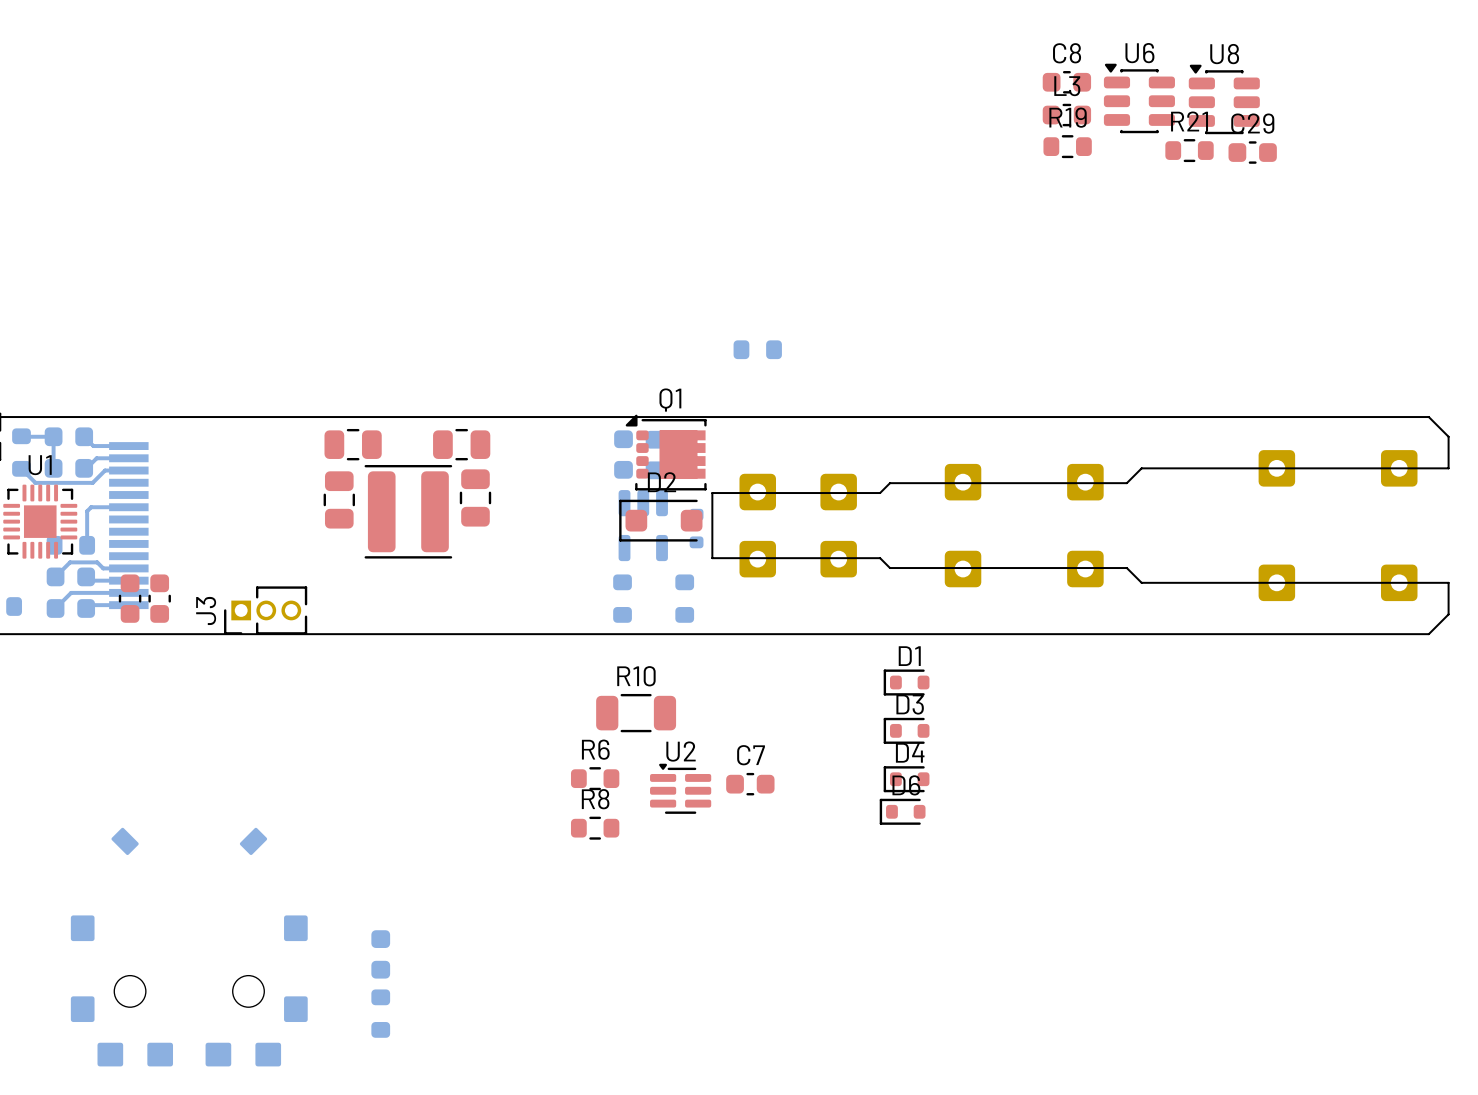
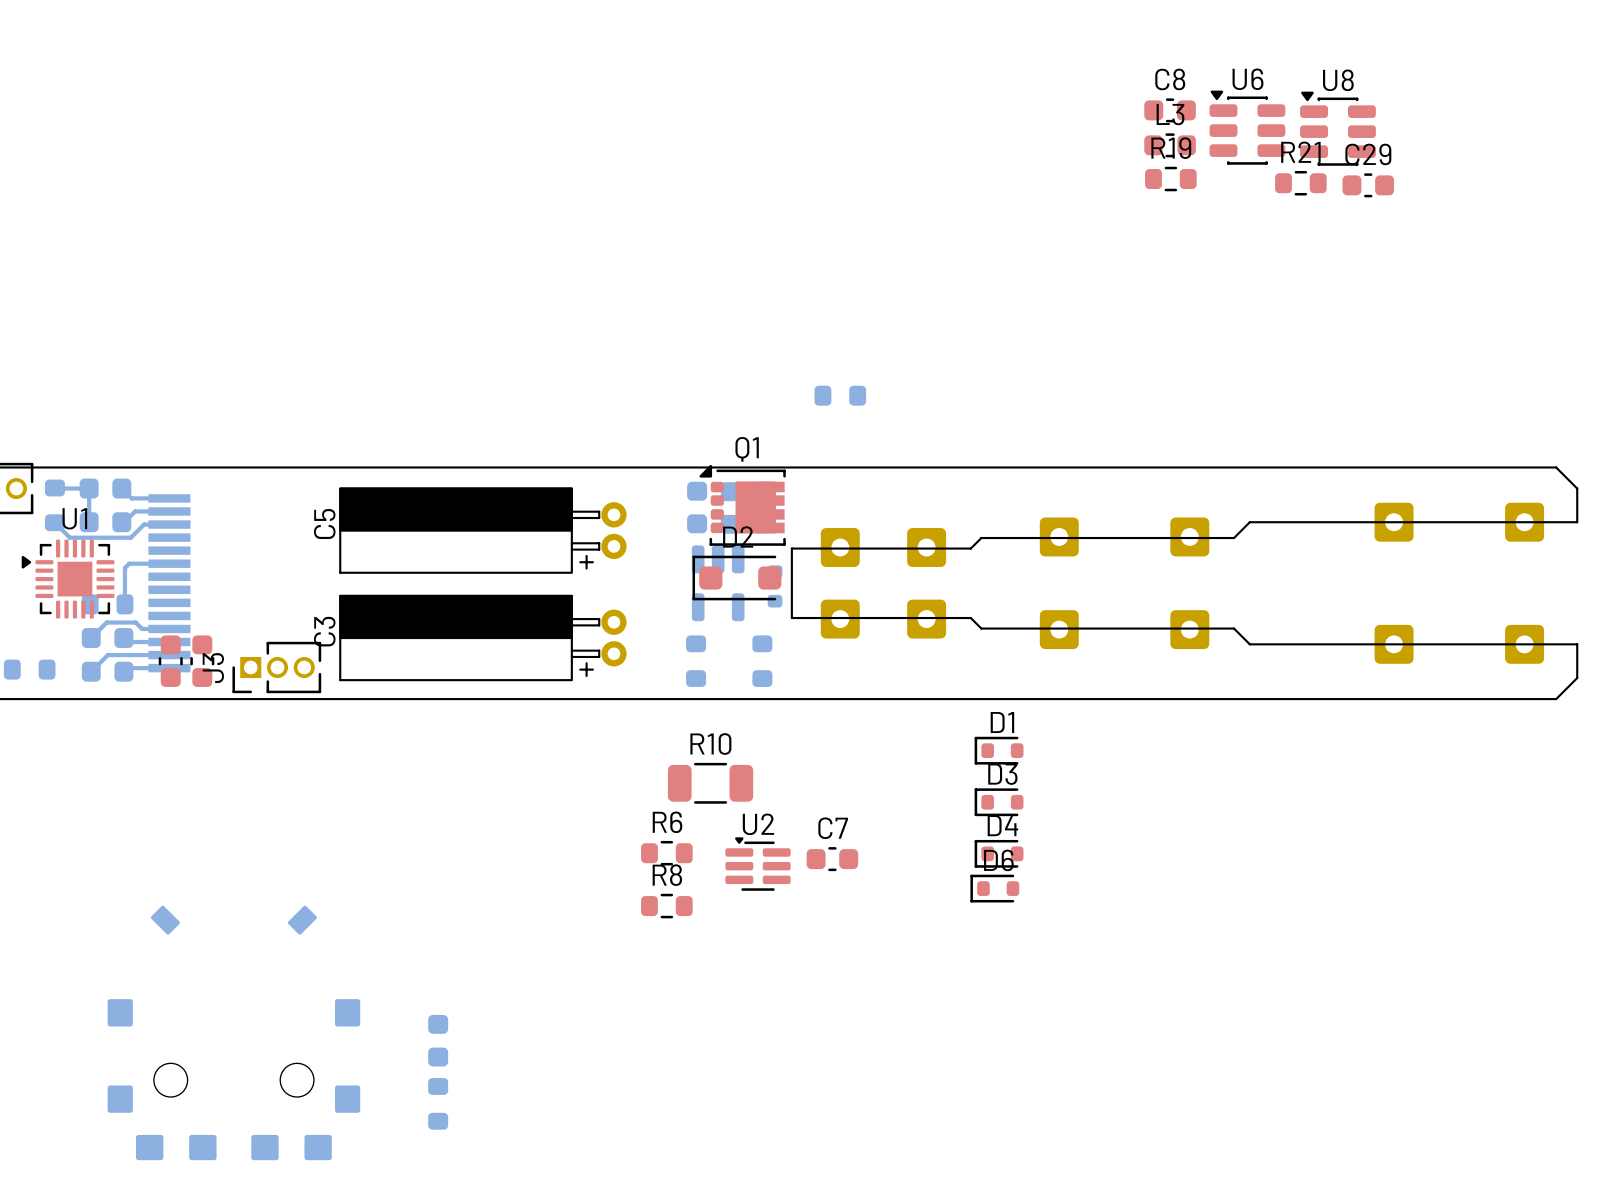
part: (353, 444) -> none
part: (461, 444) -> none
C5: none -> (482, 530)
part: (475, 497) -> none
part: (339, 499) -> none
part: (408, 511) -> none
C3: none -> (482, 638)
J3 position: (265, 610) -> (276, 667)

